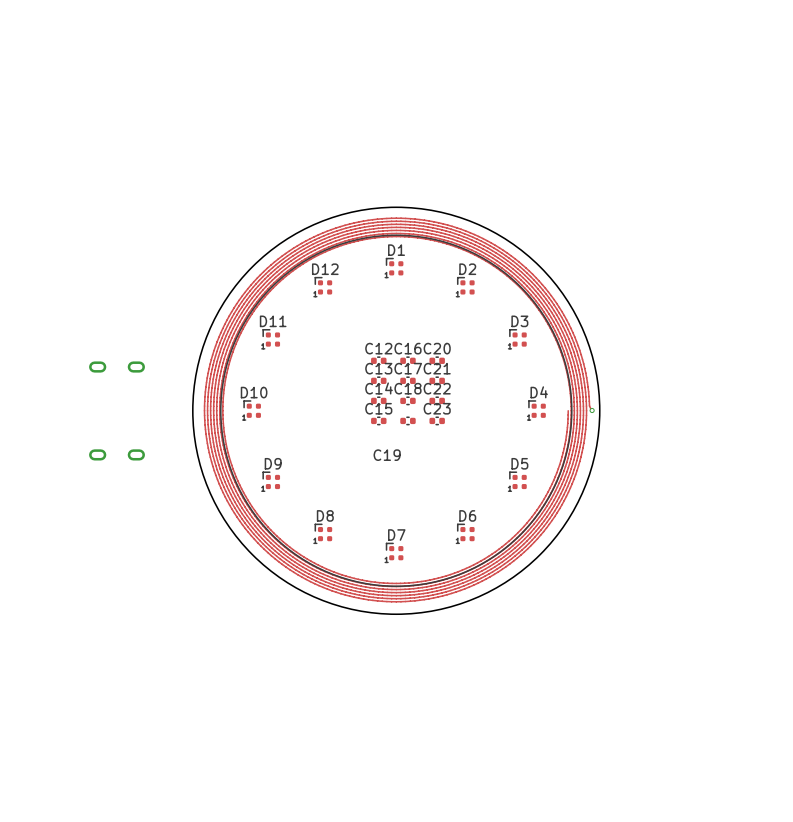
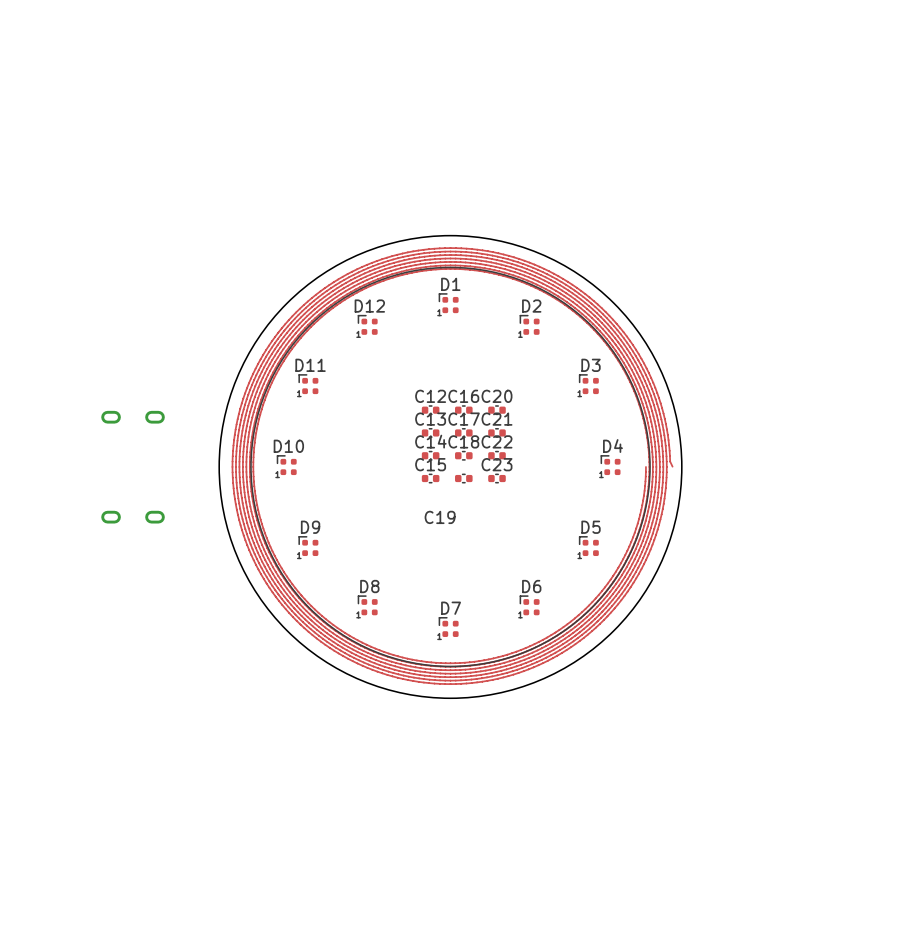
via: (592, 410) -> none

